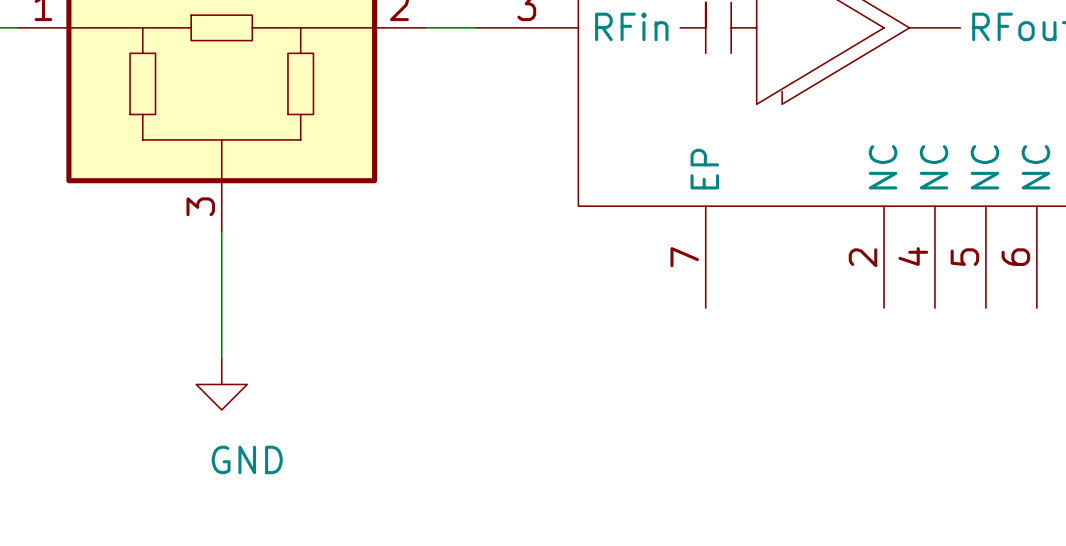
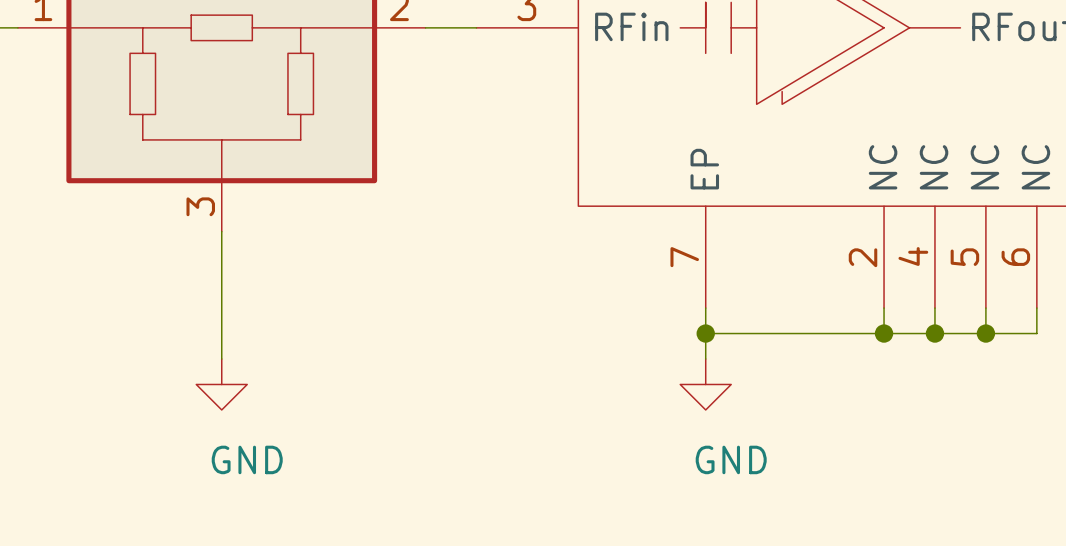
wire: none -> (705, 308) (705, 359)
wire: none -> (884, 308) (884, 333)
wire: none -> (934, 308) (934, 333)
wire: none -> (985, 308) (985, 333)
wire: none -> (1036, 308) (1036, 333) (705, 333)
junction: none -> (705, 333)
junction: none -> (884, 333)
junction: none -> (934, 333)
junction: none -> (985, 333)
power symbol: none -> GND (705, 384)

